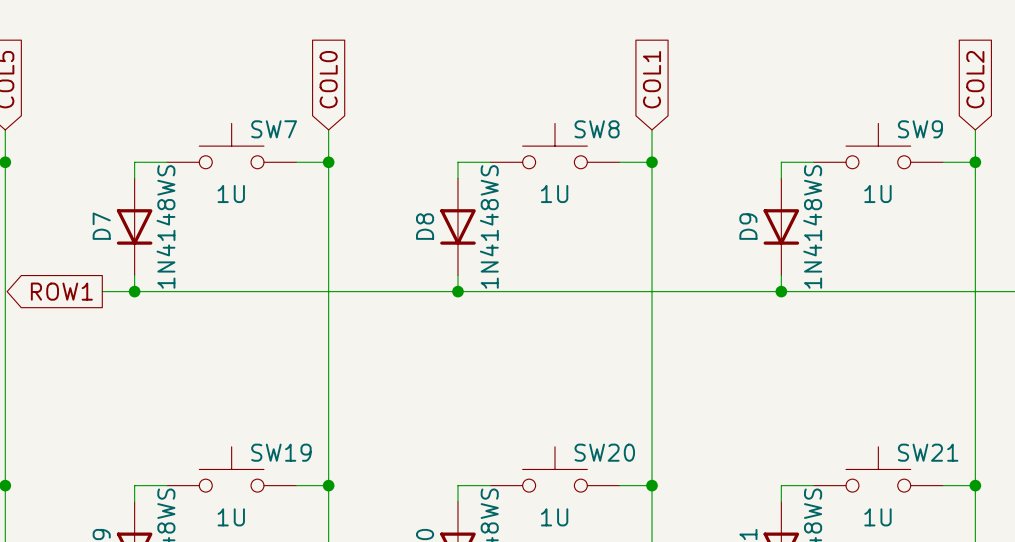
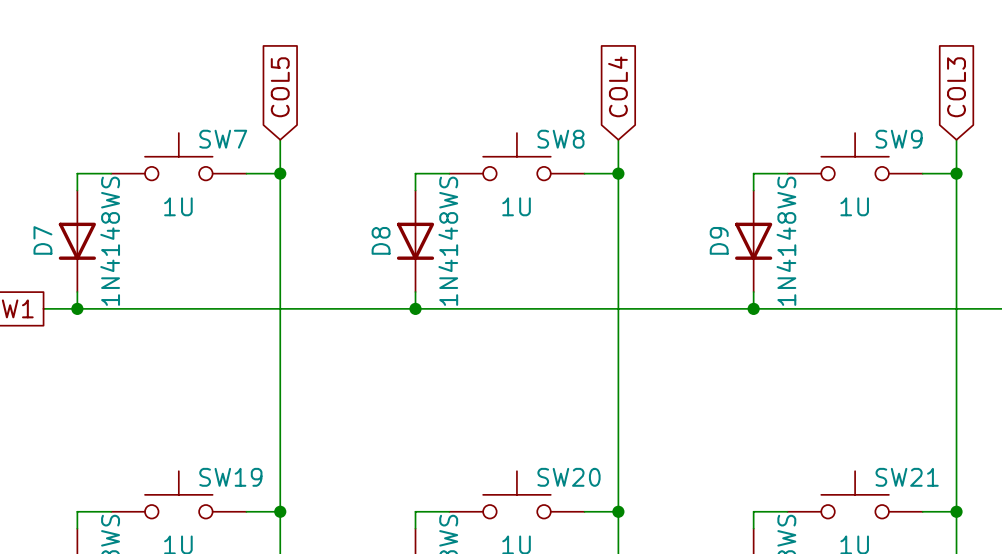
global label: COL0 (328, 79) -> COL5 (280, 87)
global label: COL1 (652, 79) -> COL4 (617, 86)
global label: COL2 (975, 79) -> COL3 (956, 87)

